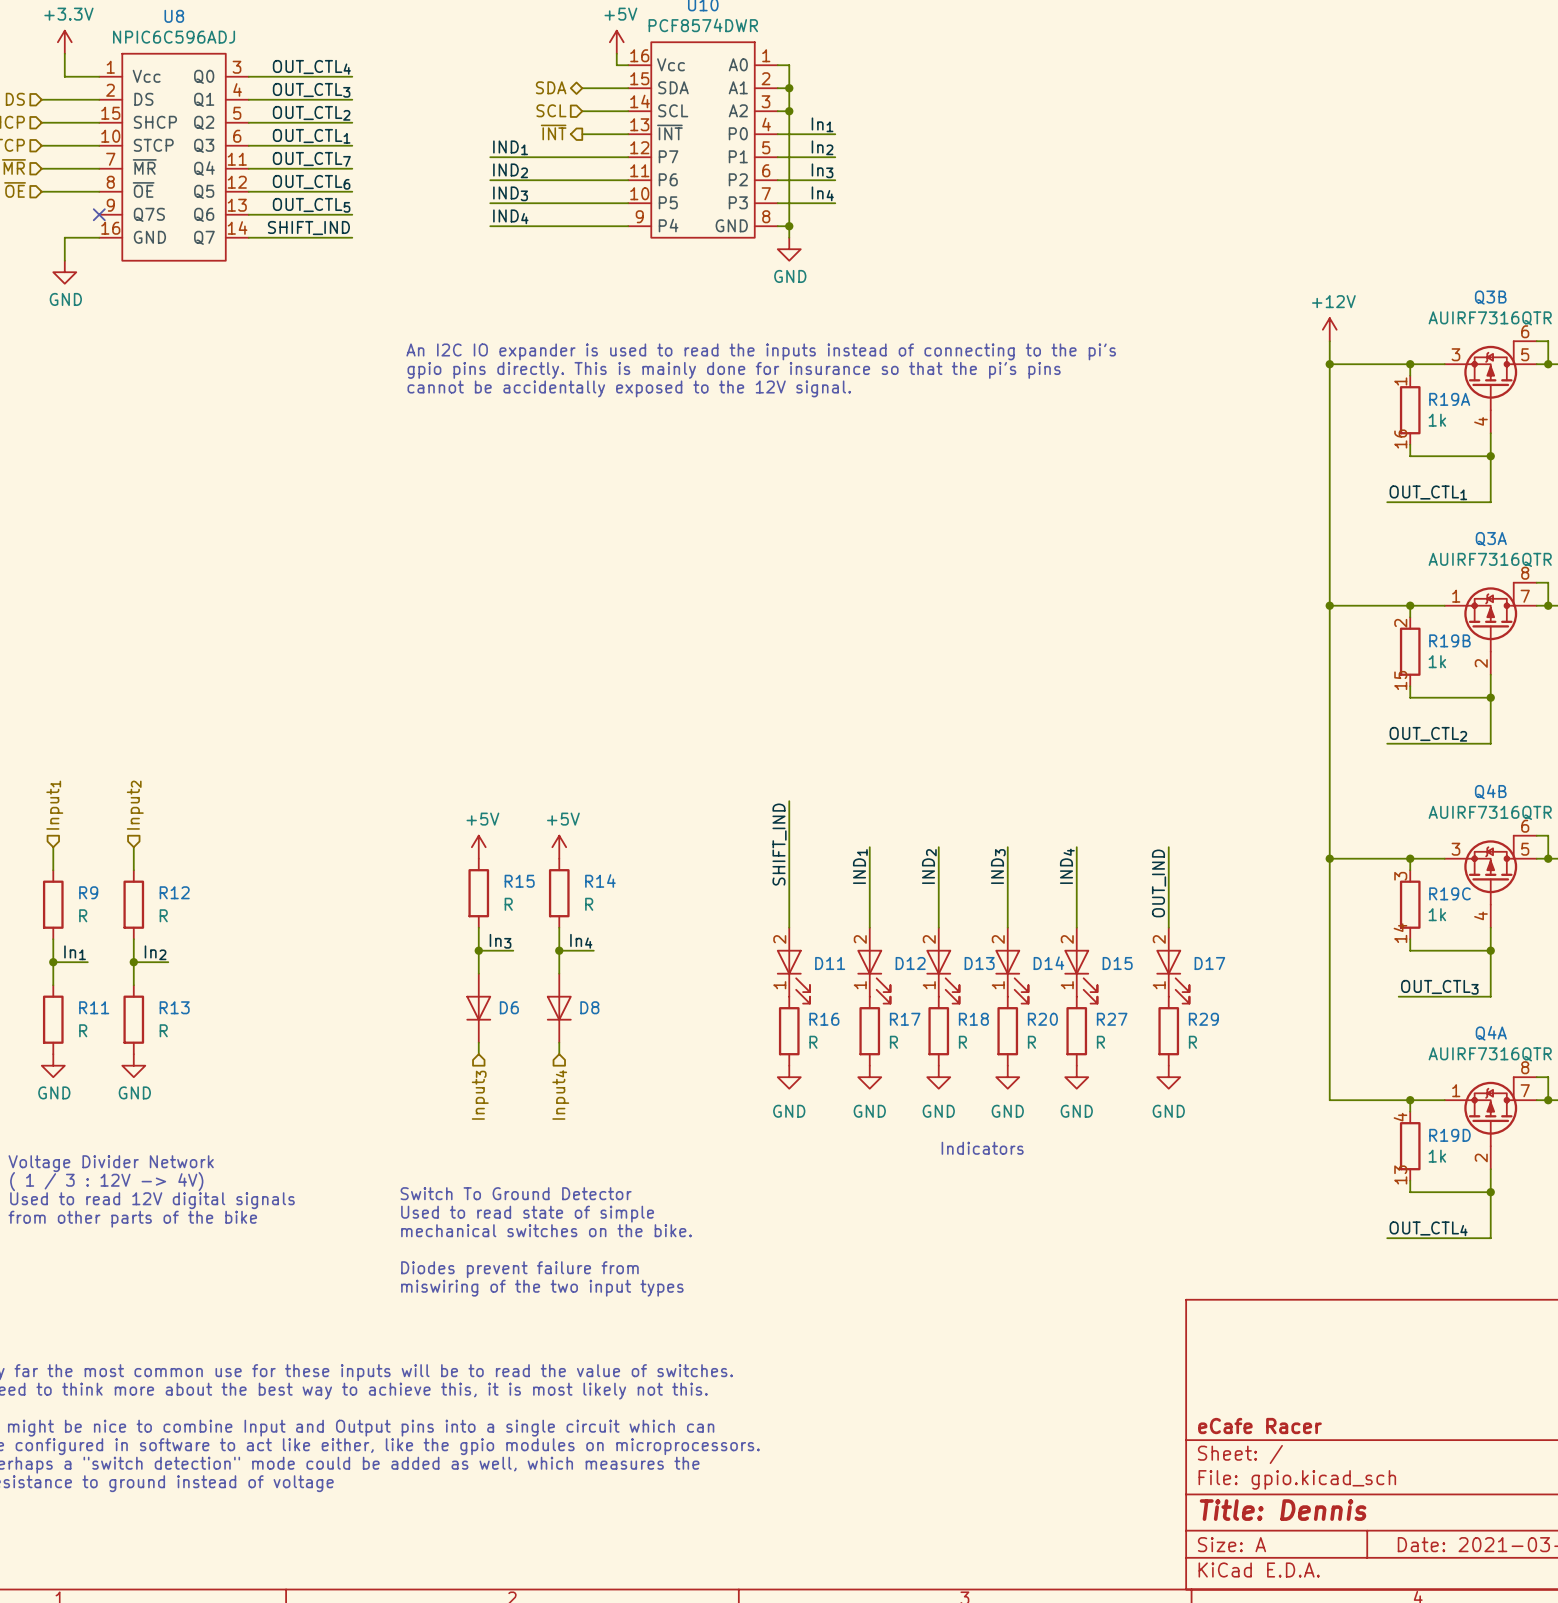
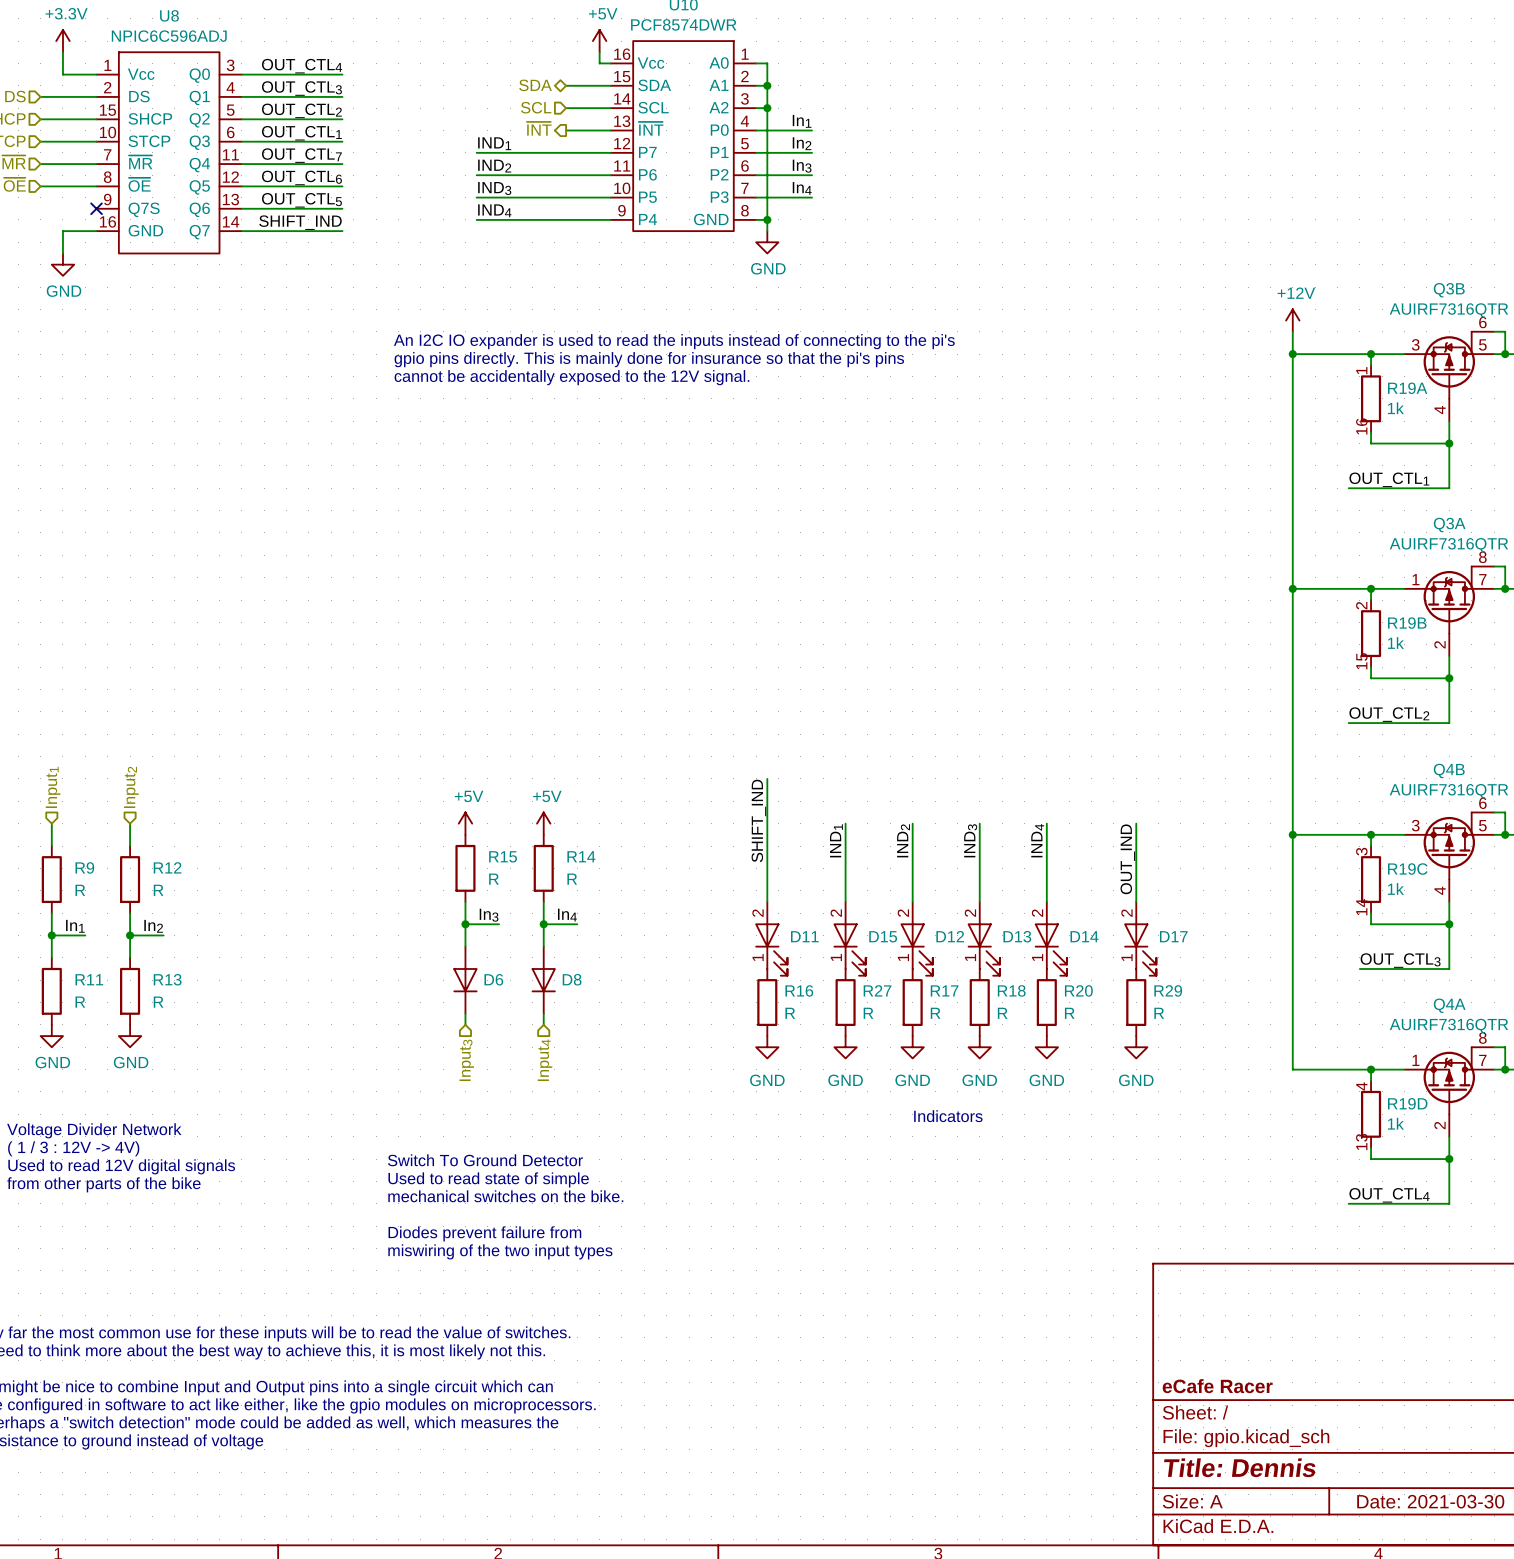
D12 name: D12 (910, 963) -> D15 (883, 936)
D13 name: D13 (979, 963) -> D12 (950, 936)
D14 name: D14 (1048, 963) -> D13 (1017, 936)
D15 name: D15 (1117, 963) -> D14 (1084, 936)
R17 name: R17 (905, 1019) -> R27 (877, 990)
R18 name: R18 (973, 1019) -> R17 (944, 990)
R20 name: R20 (1042, 1019) -> R18 (1011, 990)
R27 name: R27 (1112, 1019) -> R20 (1078, 990)

